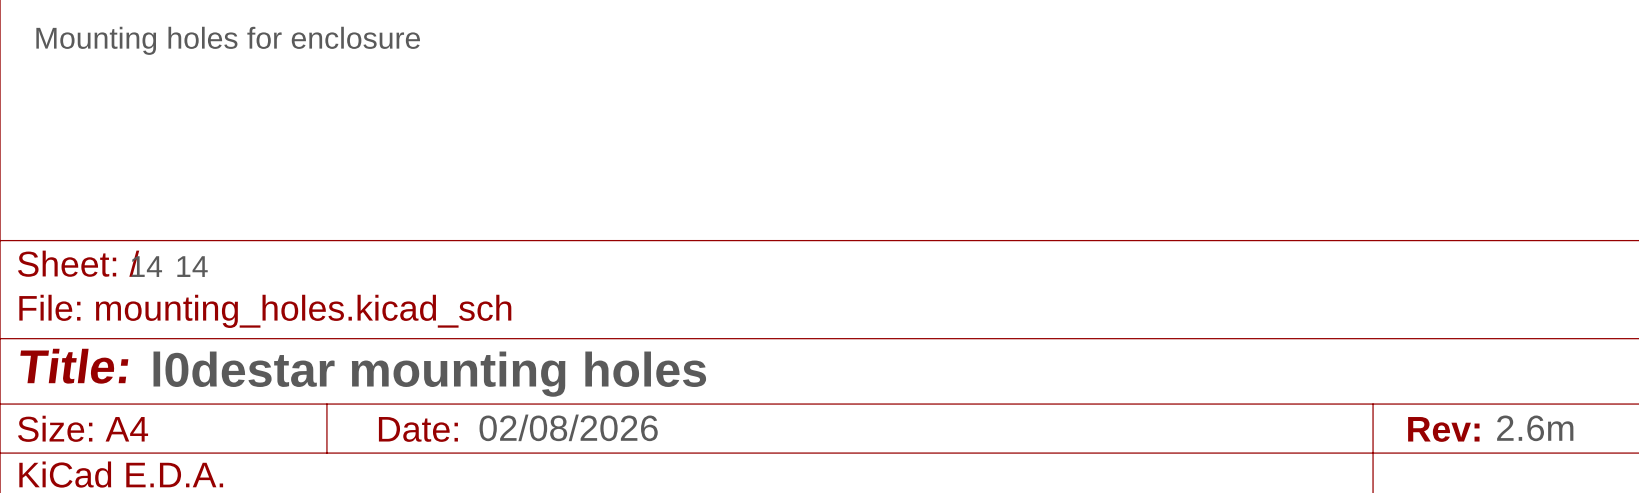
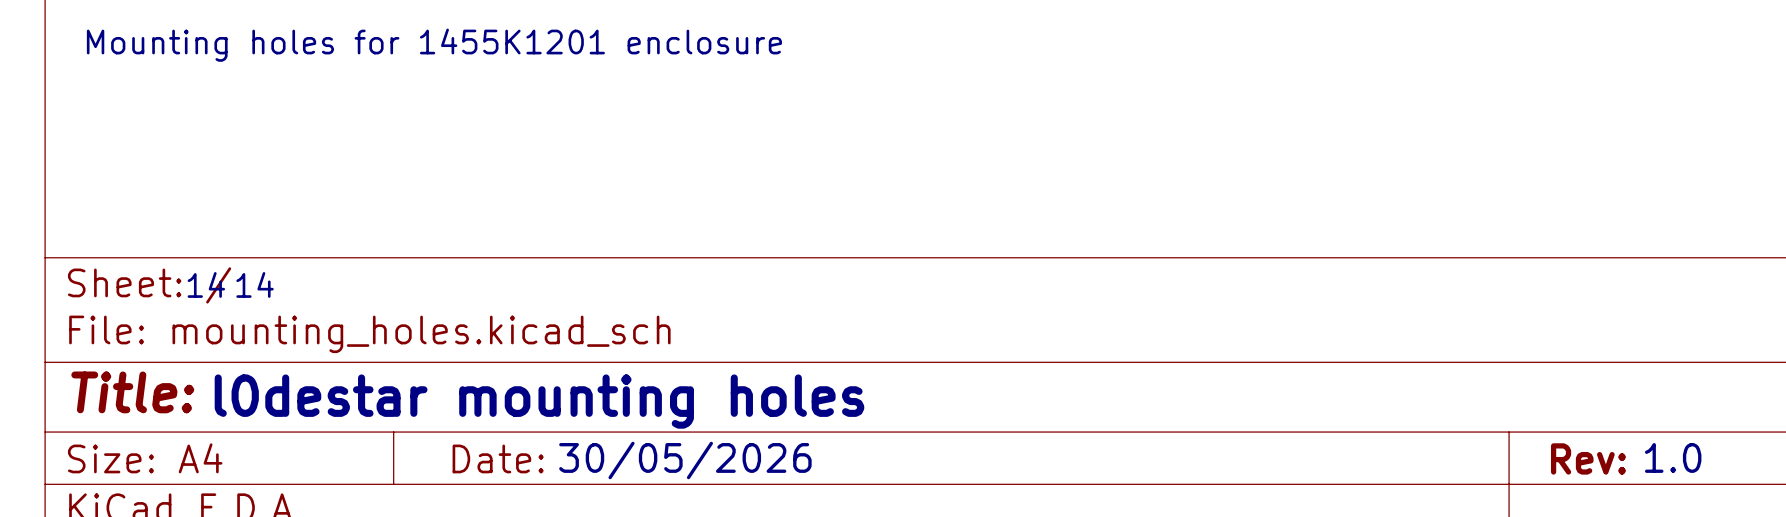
text: Mounting holes for enclosure (228, 40) -> Mounting holes for 1455K1201 enclosure (434, 45)
text: 02/08/2026 (568, 427) -> 30/05/2026 (685, 460)
text: 2.6m (1535, 428) -> 1.0 (1673, 457)

